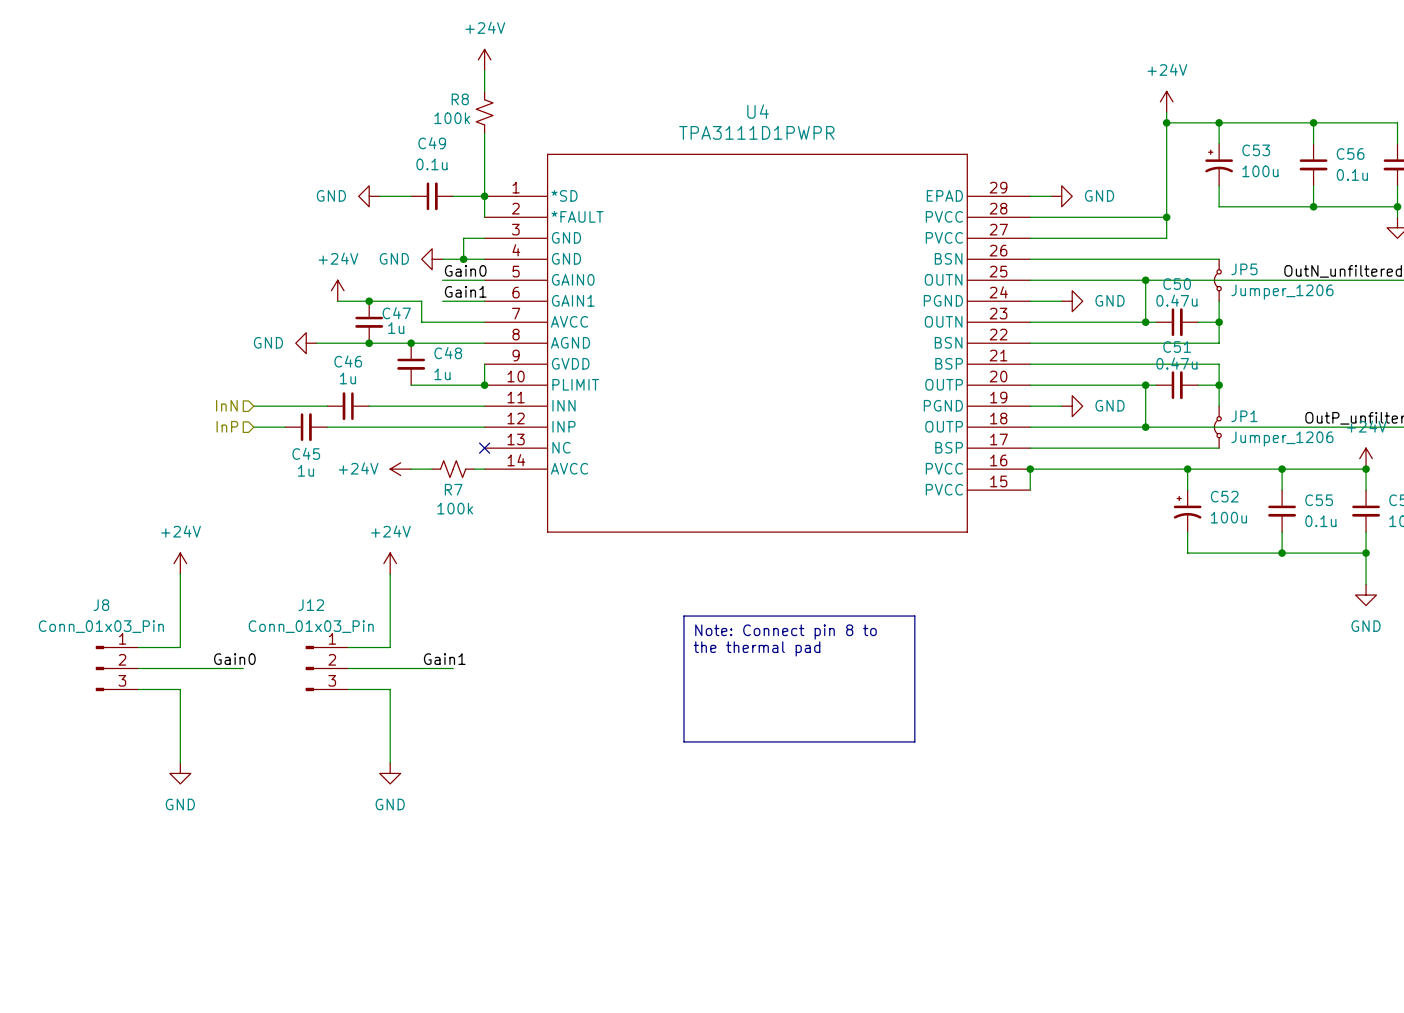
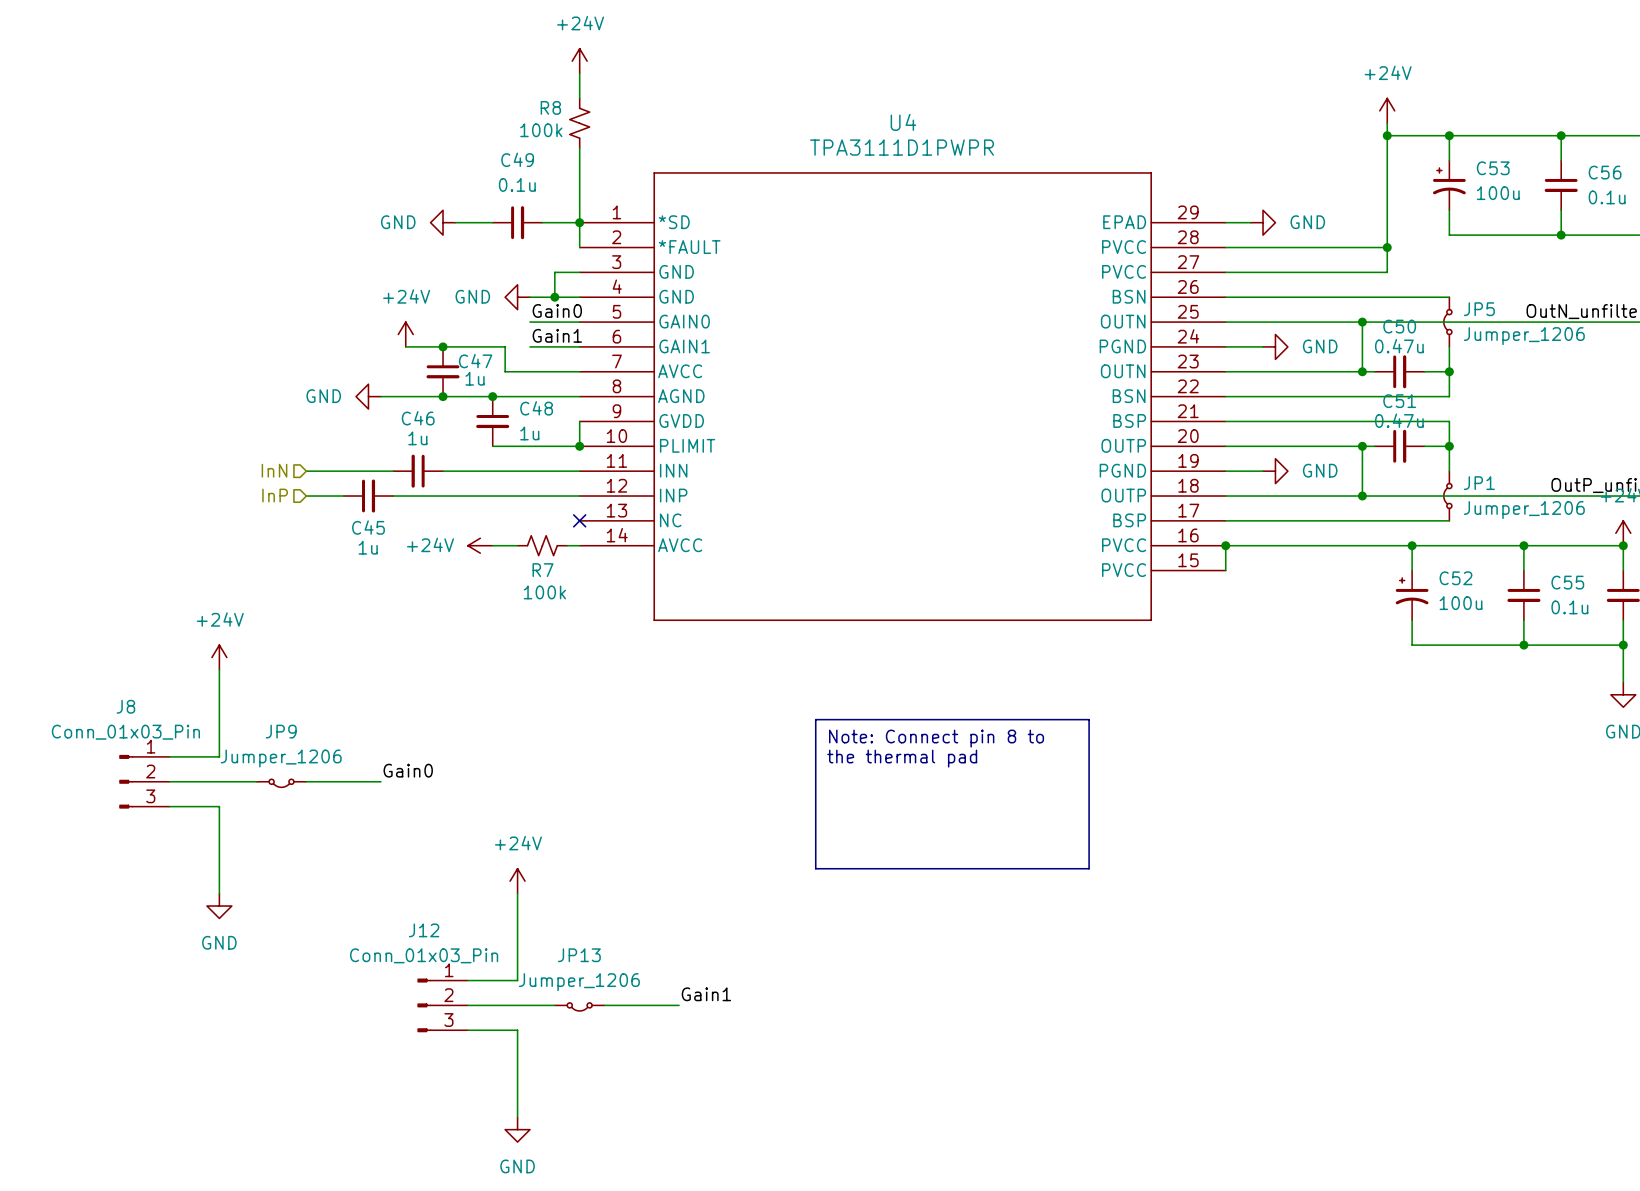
power symbol position: +24V (390, 563) -> +24V (517, 881)
wire: (390, 574) (390, 647) (348, 647) -> (517, 893) (517, 980) (467, 980)
label position: Gain0 (234, 659) -> Gain0 (408, 770)
label: Gain1 (444, 659) -> none
wire: (211, 668) (243, 668) -> none
wire: none -> (306, 781) (380, 781)
J12 position: (326, 668) -> (442, 1005)
wire: (348, 668) (453, 668) -> none
JP9: none -> Jumper_1206 (281, 783)
wire: (348, 689) (390, 689) (390, 762) -> (467, 1030) (517, 1030) (517, 1117)
power symbol position: GND (390, 773) -> GND (517, 1129)
label: none -> Gain1 (706, 994)
wire: none -> (467, 1005) (554, 1005)
wire: none -> (604, 1005) (679, 1005)
JP13: none -> Jumper_1206 (579, 1006)

